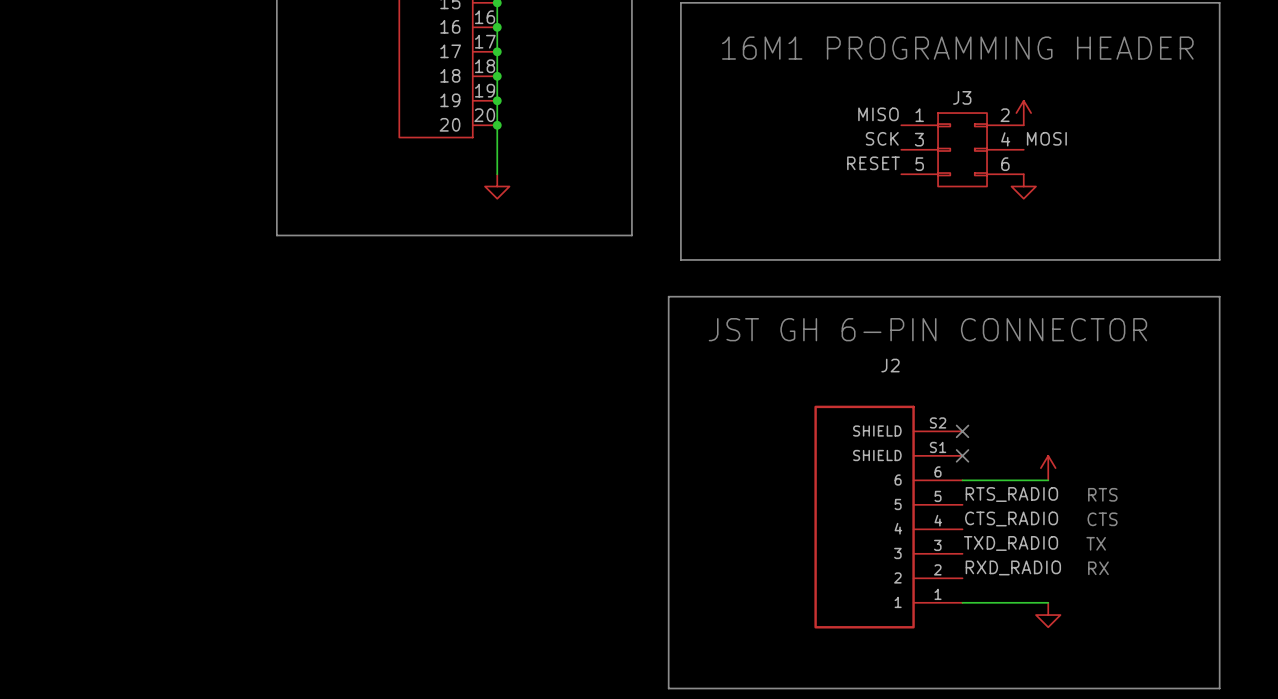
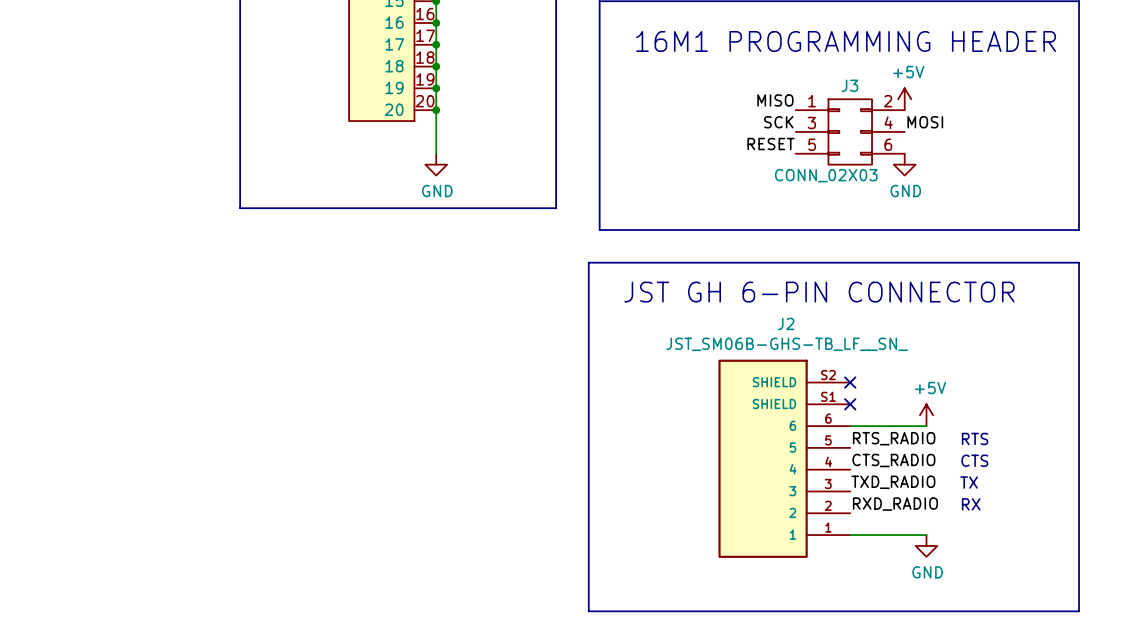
power symbol text: none -> +5V (908, 72)
J3 value: none -> CONN_02X03 (826, 175)
power symbol text: none -> GND (437, 191)
power symbol text: none -> GND (905, 191)
J2 value: none -> JST_SM06B-GHS-TB_LF__SN_ (787, 344)
power symbol text: none -> +5V (930, 388)
power symbol text: none -> GND (927, 572)

